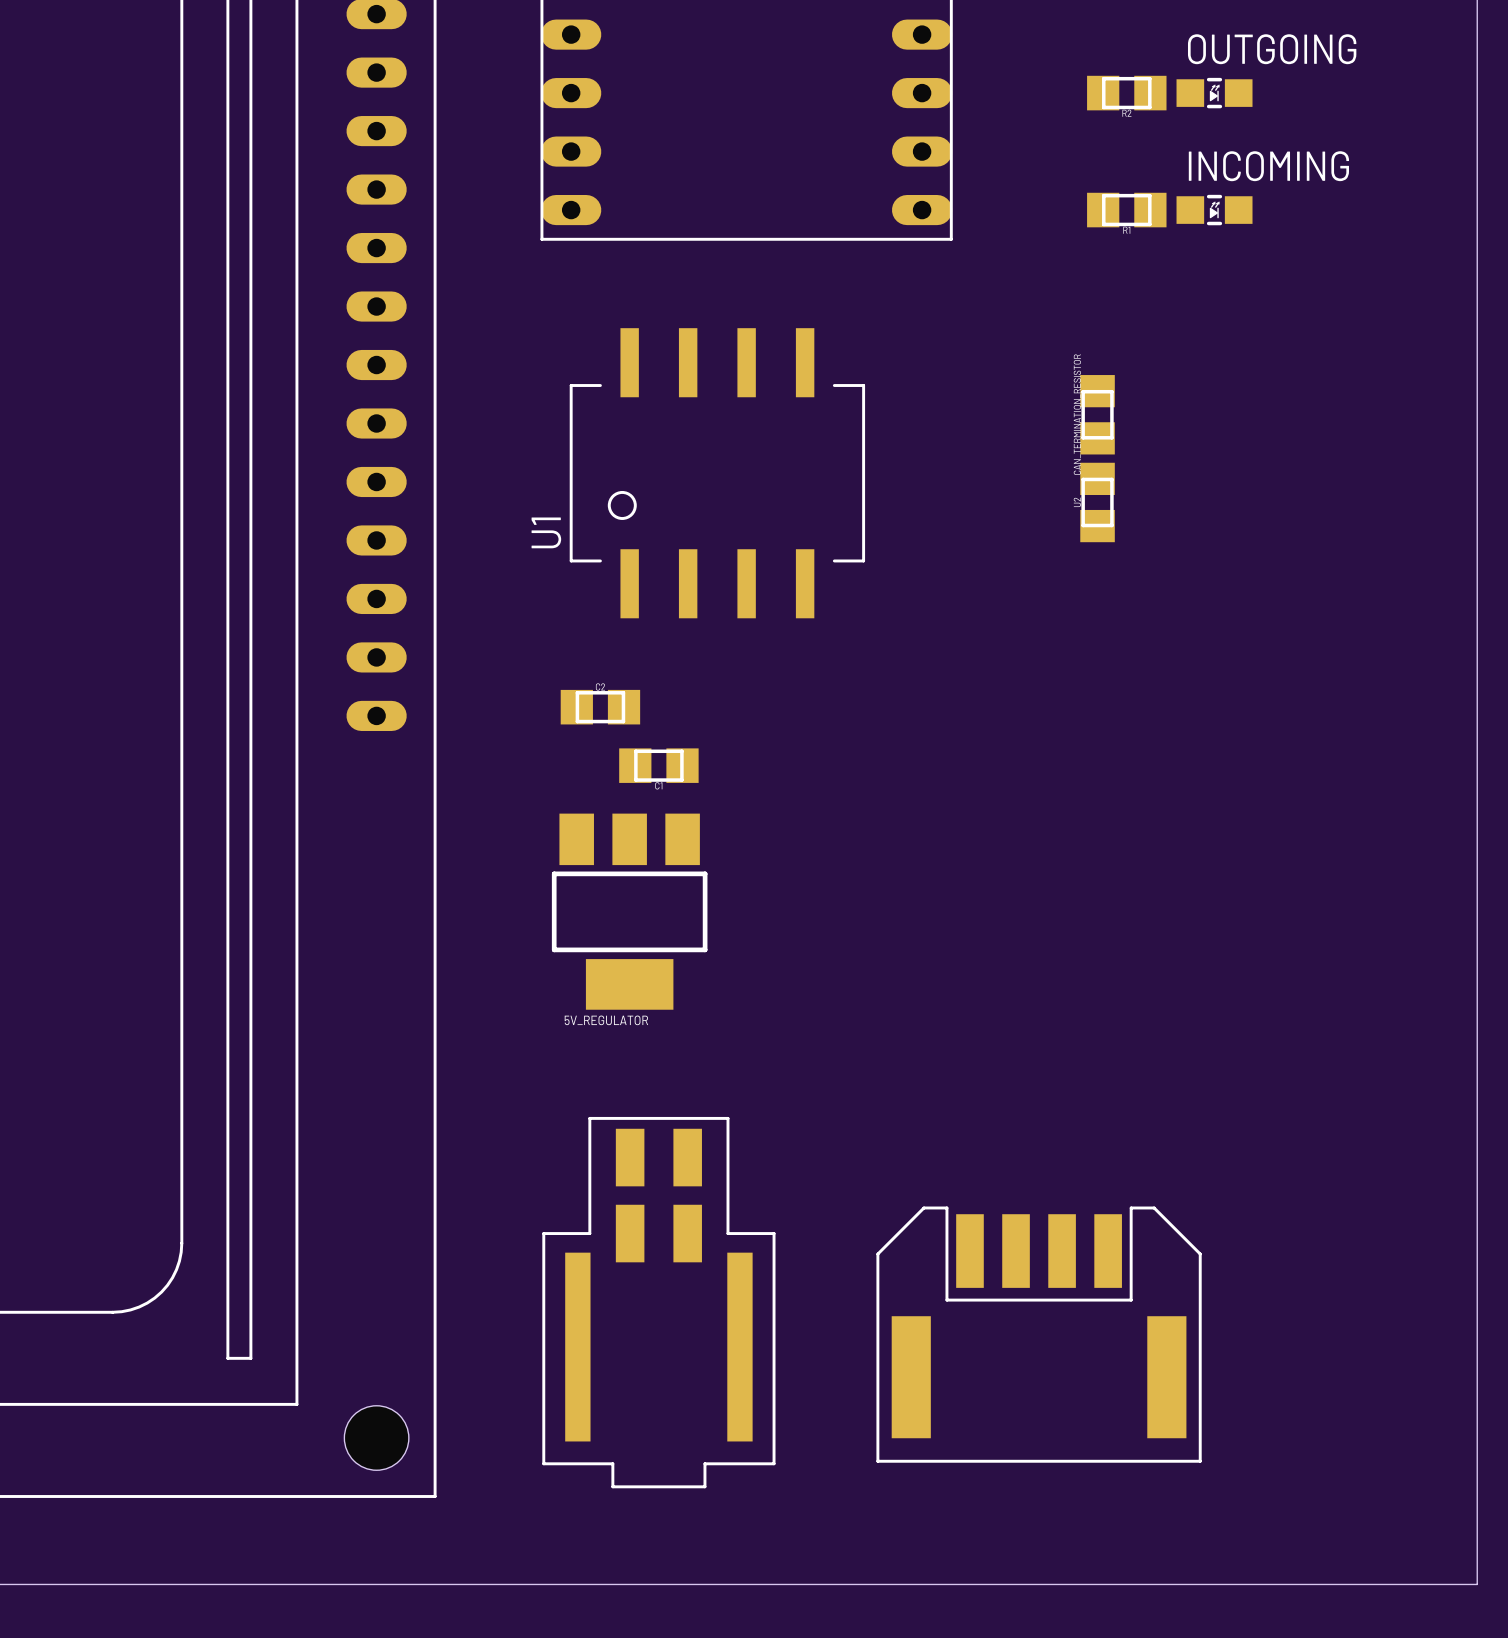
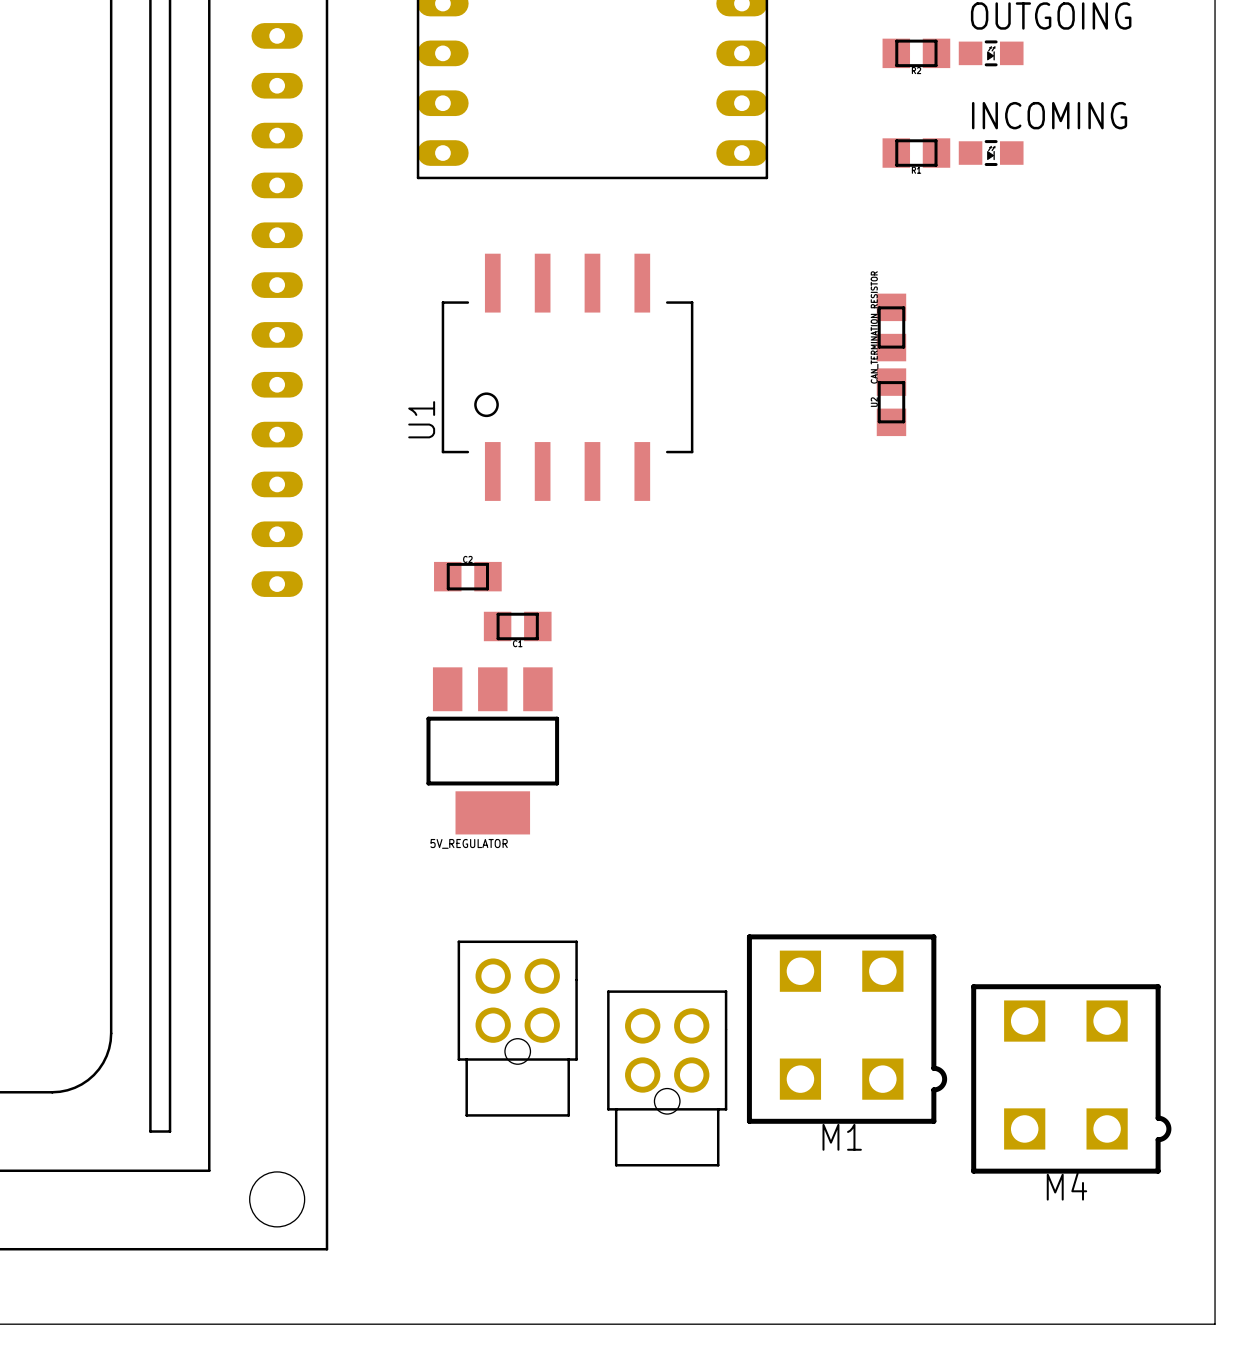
part: none -> (517, 1028)
M1: none -> (847, 1029)
part: none -> (667, 1078)
M4: none -> (1071, 1078)
part: (658, 1302) -> none
part: (1039, 1334) -> none

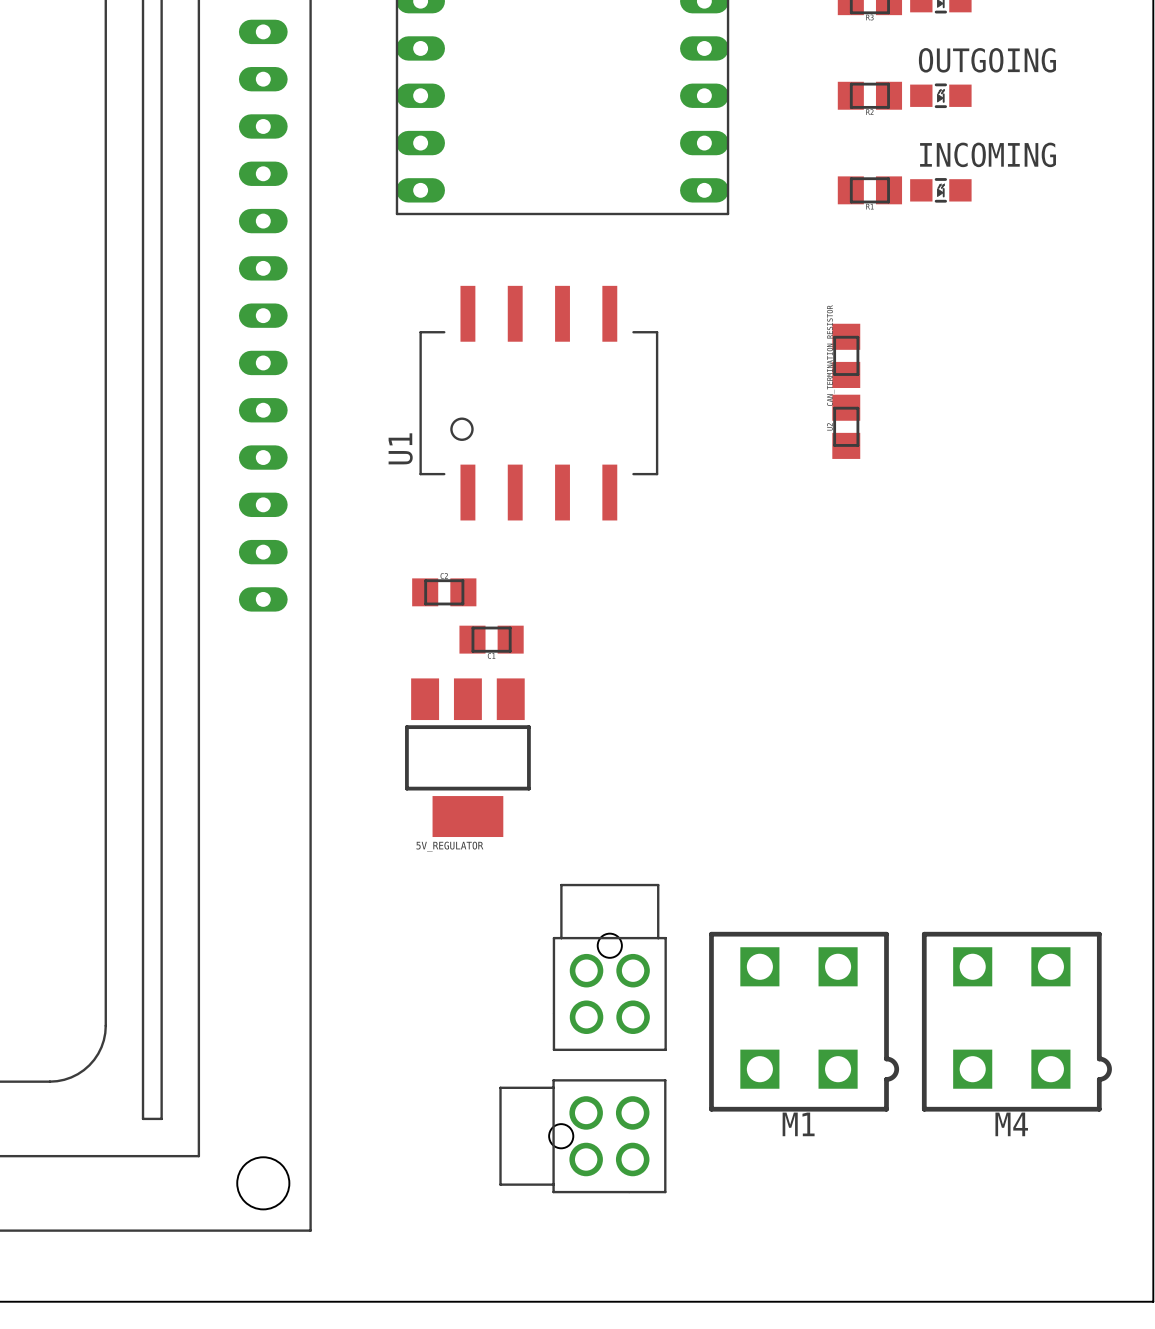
part: none -> (609, 967)
part: (517, 1028) -> none
part: (667, 1078) -> none
M4 position: (1071, 1078) -> (1016, 1021)
part: none -> (582, 1136)

